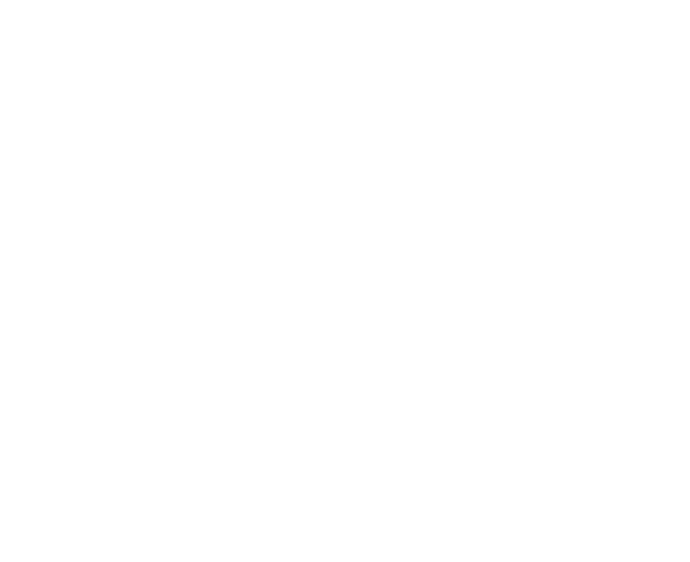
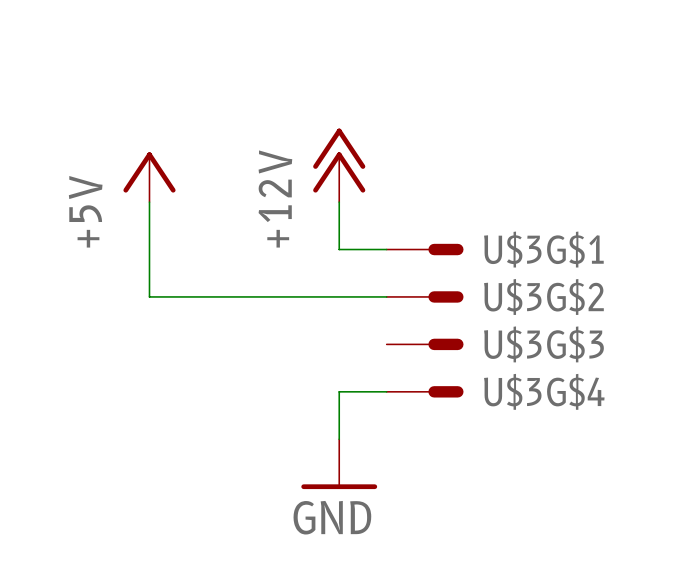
power symbol: none -> +12V (339, 165)
power symbol: none -> +5V (149, 177)
wire: none -> (149, 202) (149, 296) (386, 296)
wire: none -> (339, 202) (339, 249) (386, 249)
U$3G$1: none -> (425, 249)
U$3G$2: none -> (425, 296)
U$3G$3: none -> (425, 344)
wire: none -> (386, 391) (339, 391) (339, 439)
U$3G$4: none -> (425, 391)
power symbol: none -> GND (339, 464)

